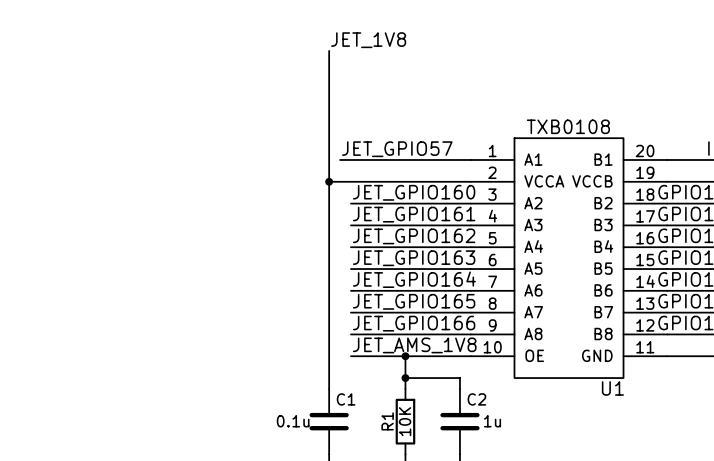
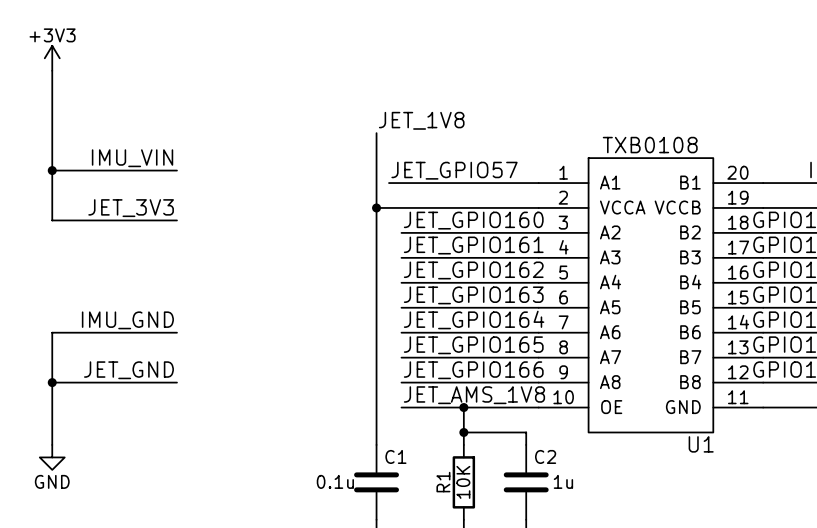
label position: JET_1V8 (368, 40) -> JET_1V8 (421, 120)
power symbol: none -> +3V3 (52, 58)
wire: (329, 50) (329, 116) -> none
wire: none -> (52, 70) (52, 220) (176, 220)
label: none -> IMU_VIN (132, 158)
wire: none -> (52, 170) (176, 170)
junction: none -> (52, 170)
label: none -> JET_3V3 (131, 208)
label: none -> IMU_GND (127, 320)
wire: none -> (176, 332) (52, 332) (52, 444)
label: none -> JET_GND (128, 370)
wire: none -> (52, 382) (176, 382)
junction: none -> (52, 382)
power symbol: none -> GND (52, 457)

